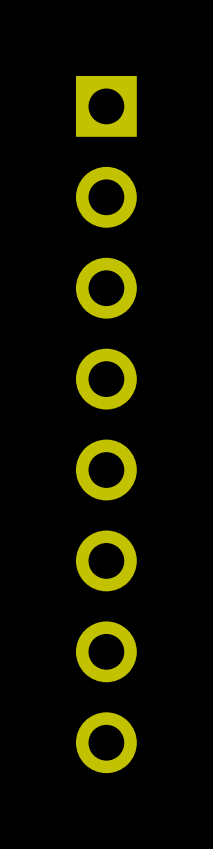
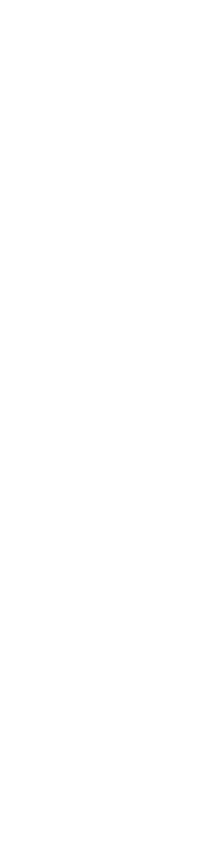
part: (106, 424) -> none

